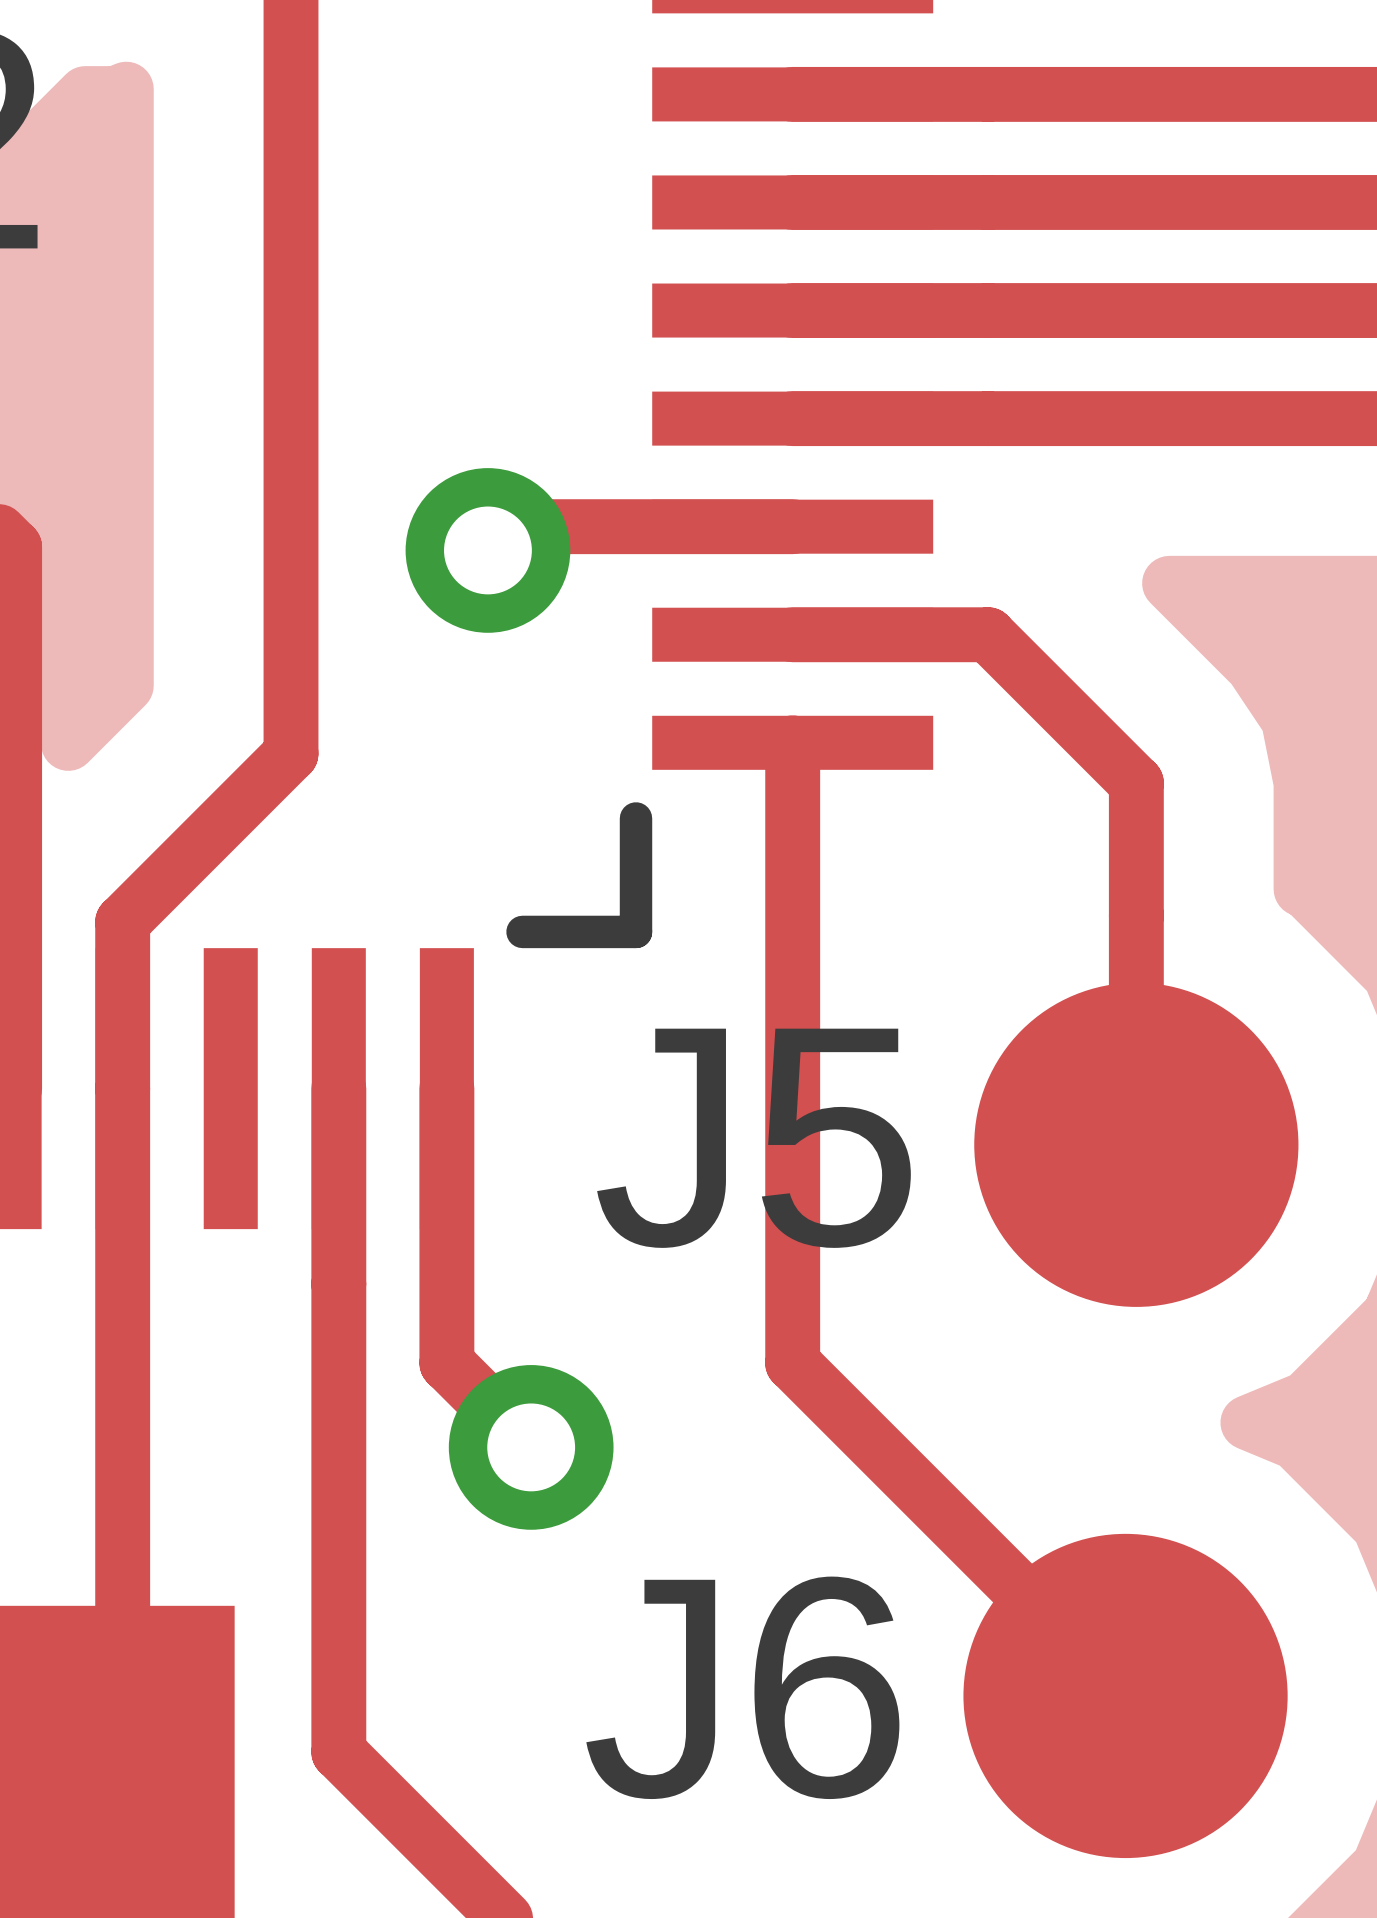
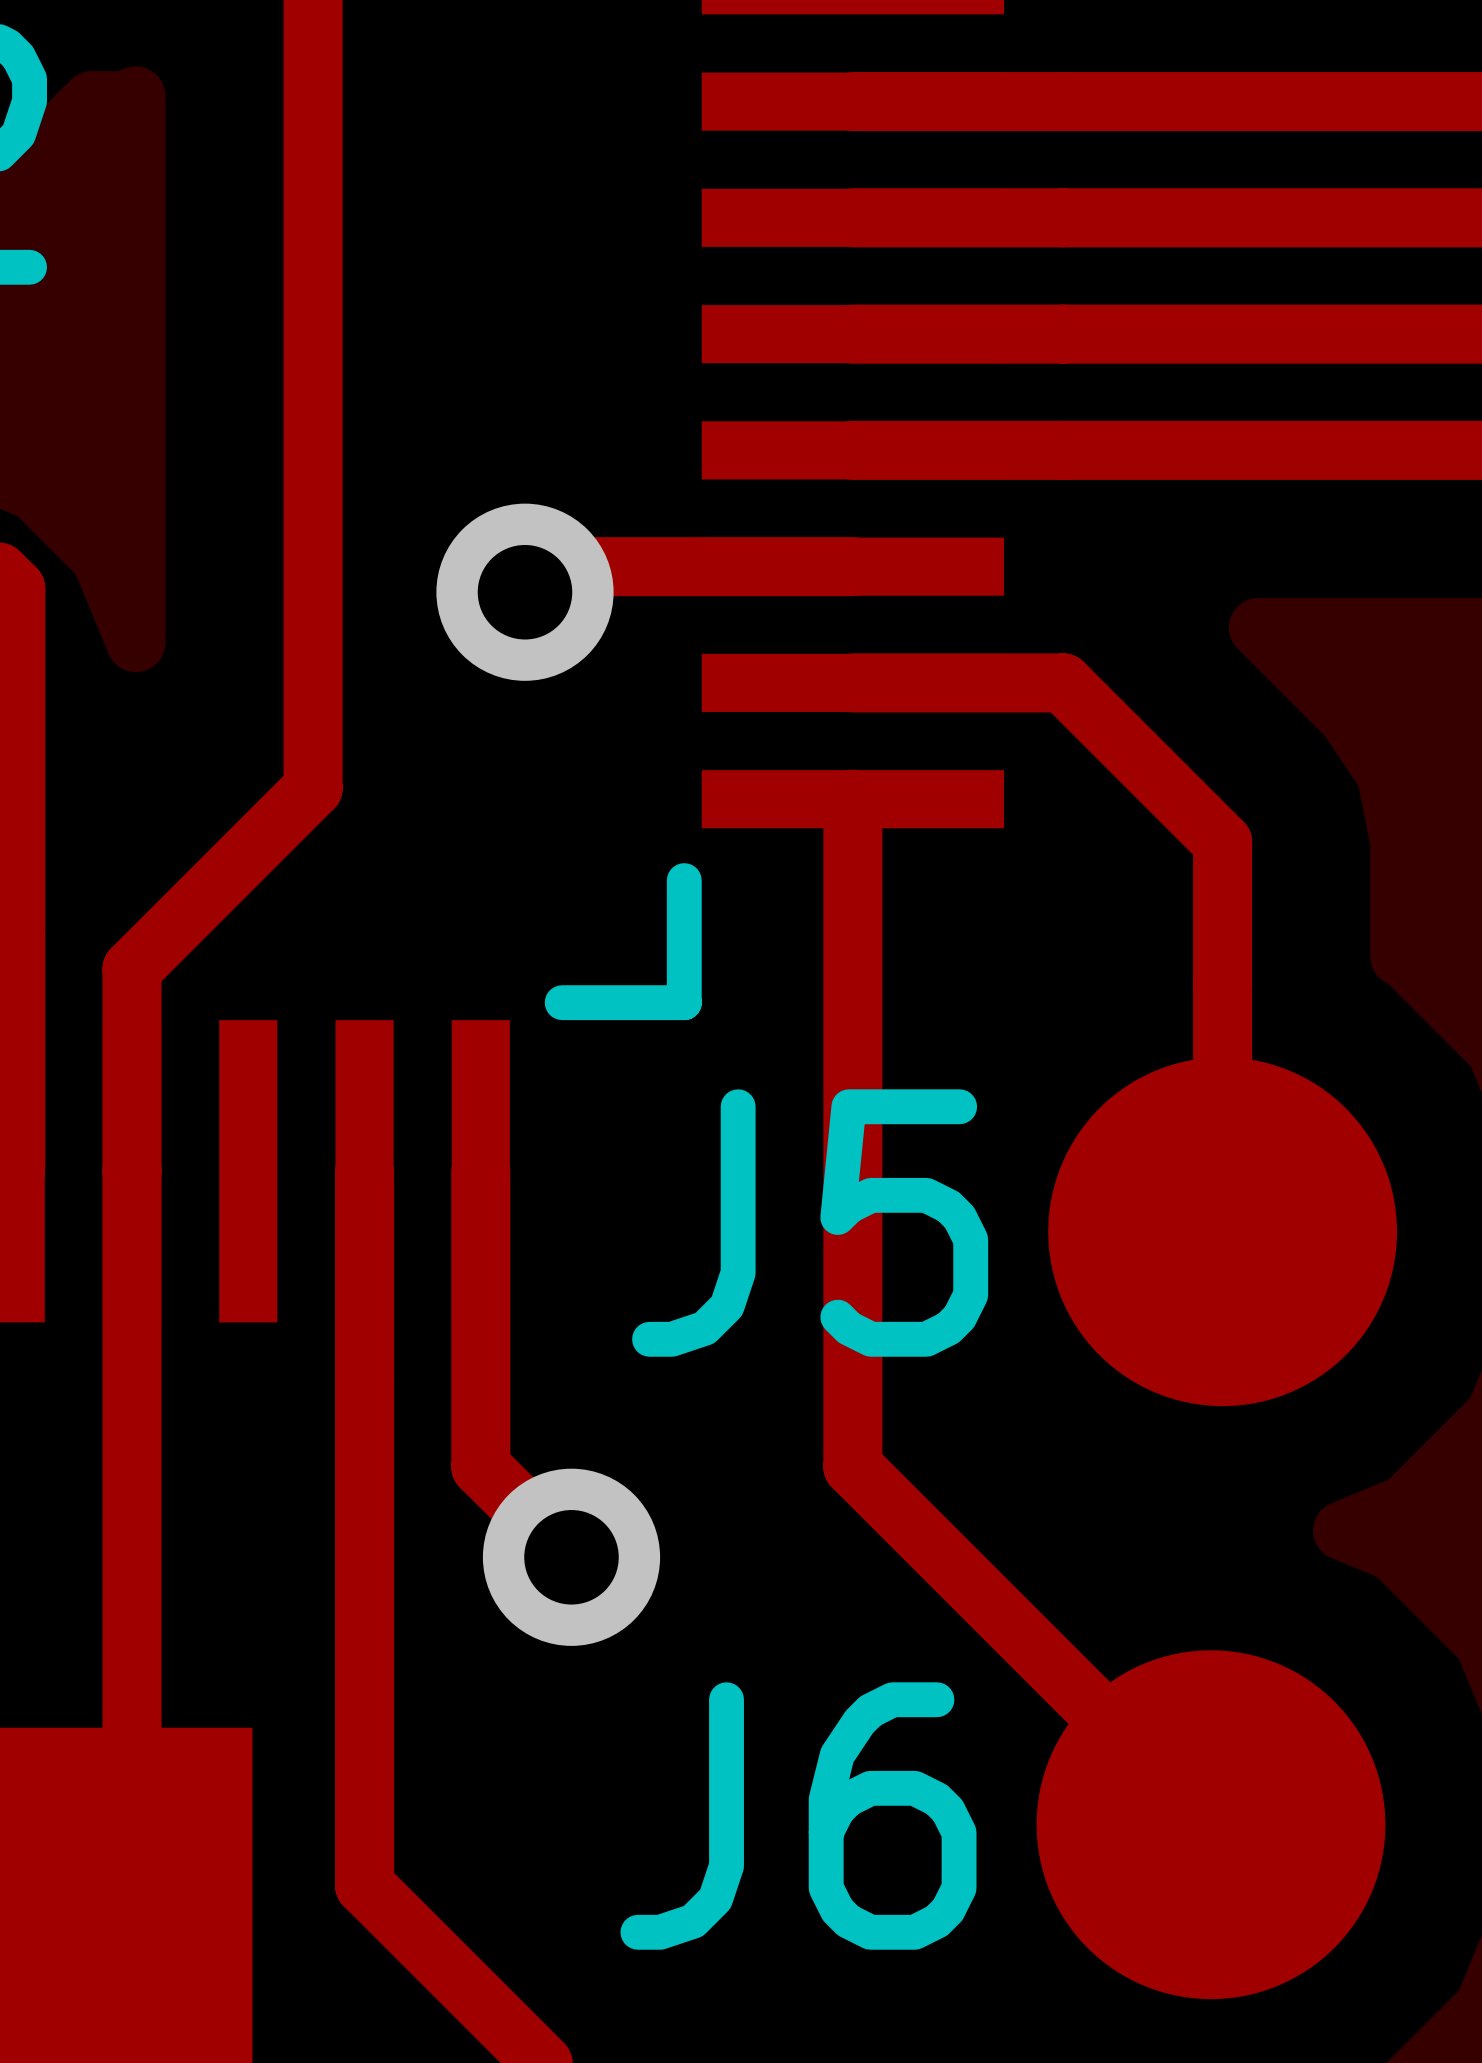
track: (291, 732) (291, 753) (122, 922) -> (313, 788) (131, 969) (131, 992)

